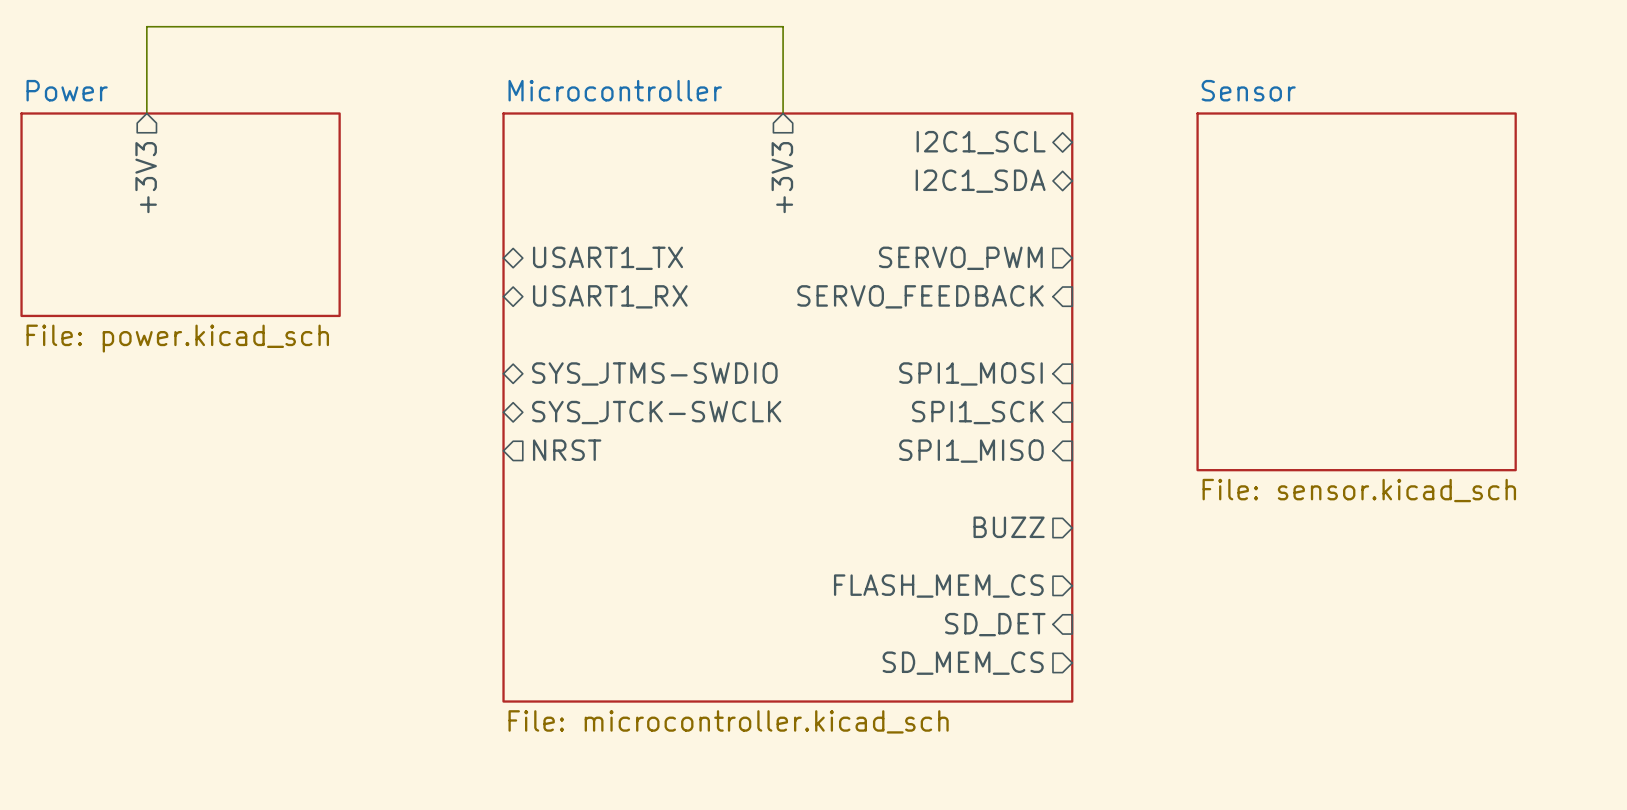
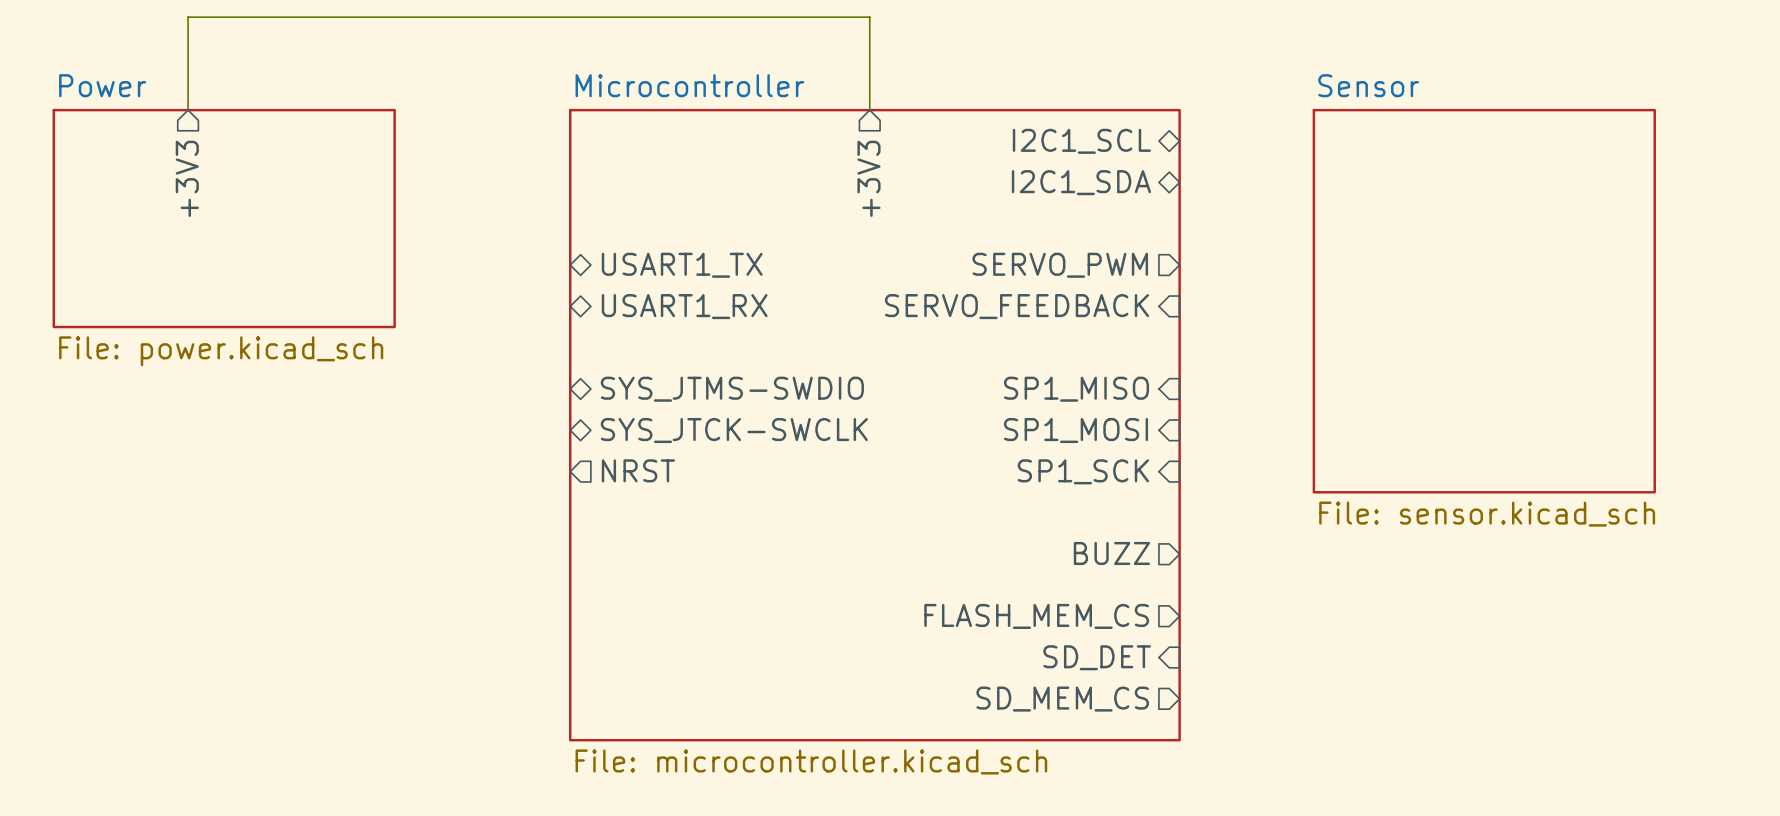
sheet pin: SPI1_MOSI (970, 373) -> SP1_MISO (1076, 389)
sheet pin: SPI1_SCK (977, 412) -> SP1_MOSI (1076, 430)
sheet pin: SPI1_MISO (971, 451) -> SP1_SCK (1083, 471)

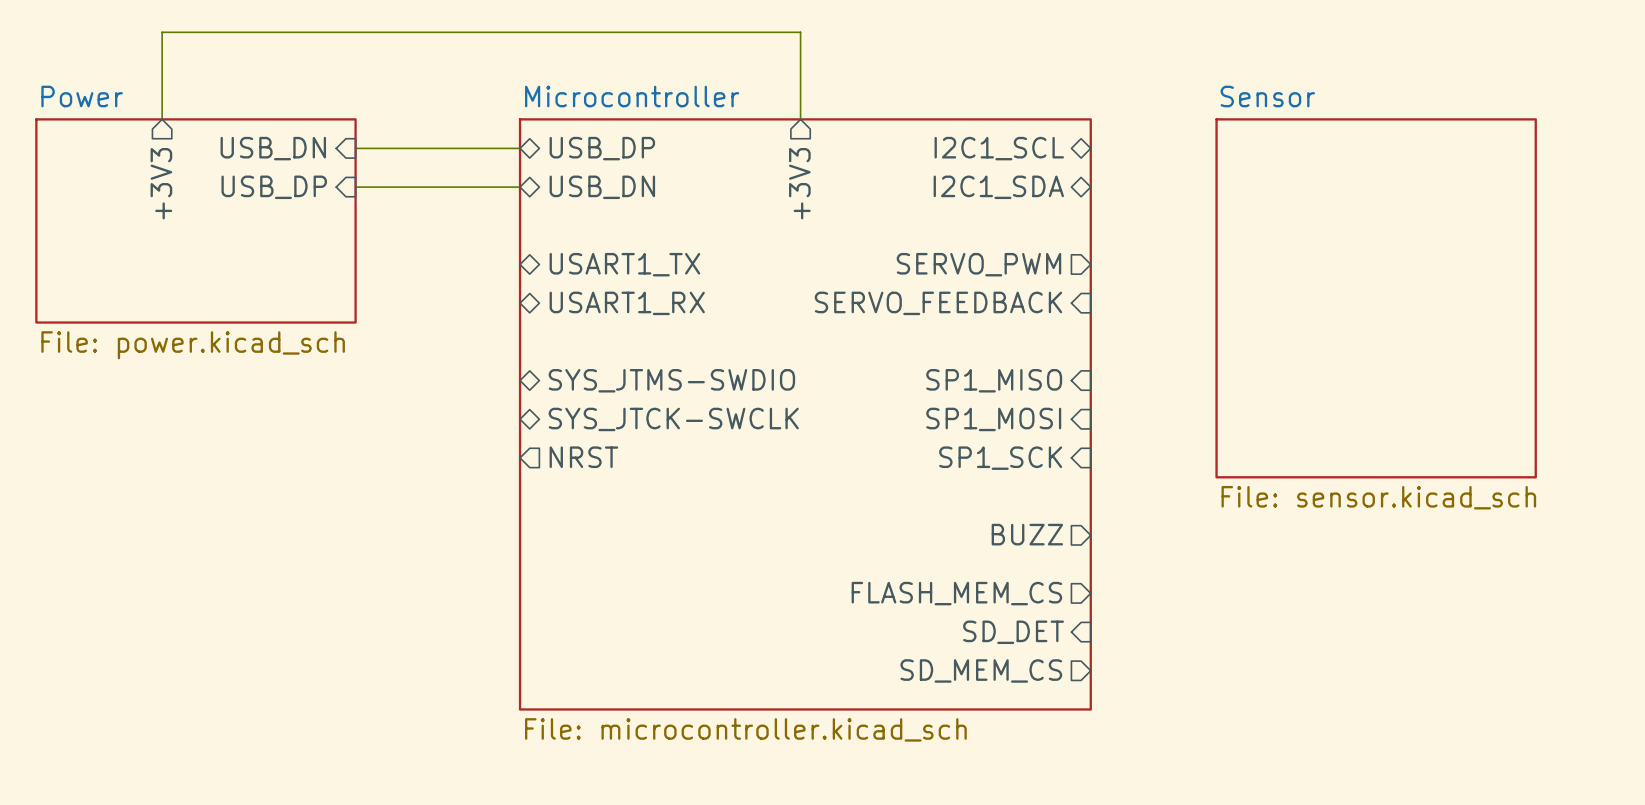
sheet pin: none -> USB_DN (273, 148)
wire: none -> (355, 148) (520, 148)
sheet pin: none -> USB_DP (602, 148)
sheet pin: none -> USB_DP (274, 187)
wire: none -> (355, 187) (520, 187)
sheet pin: none -> USB_DN (602, 187)

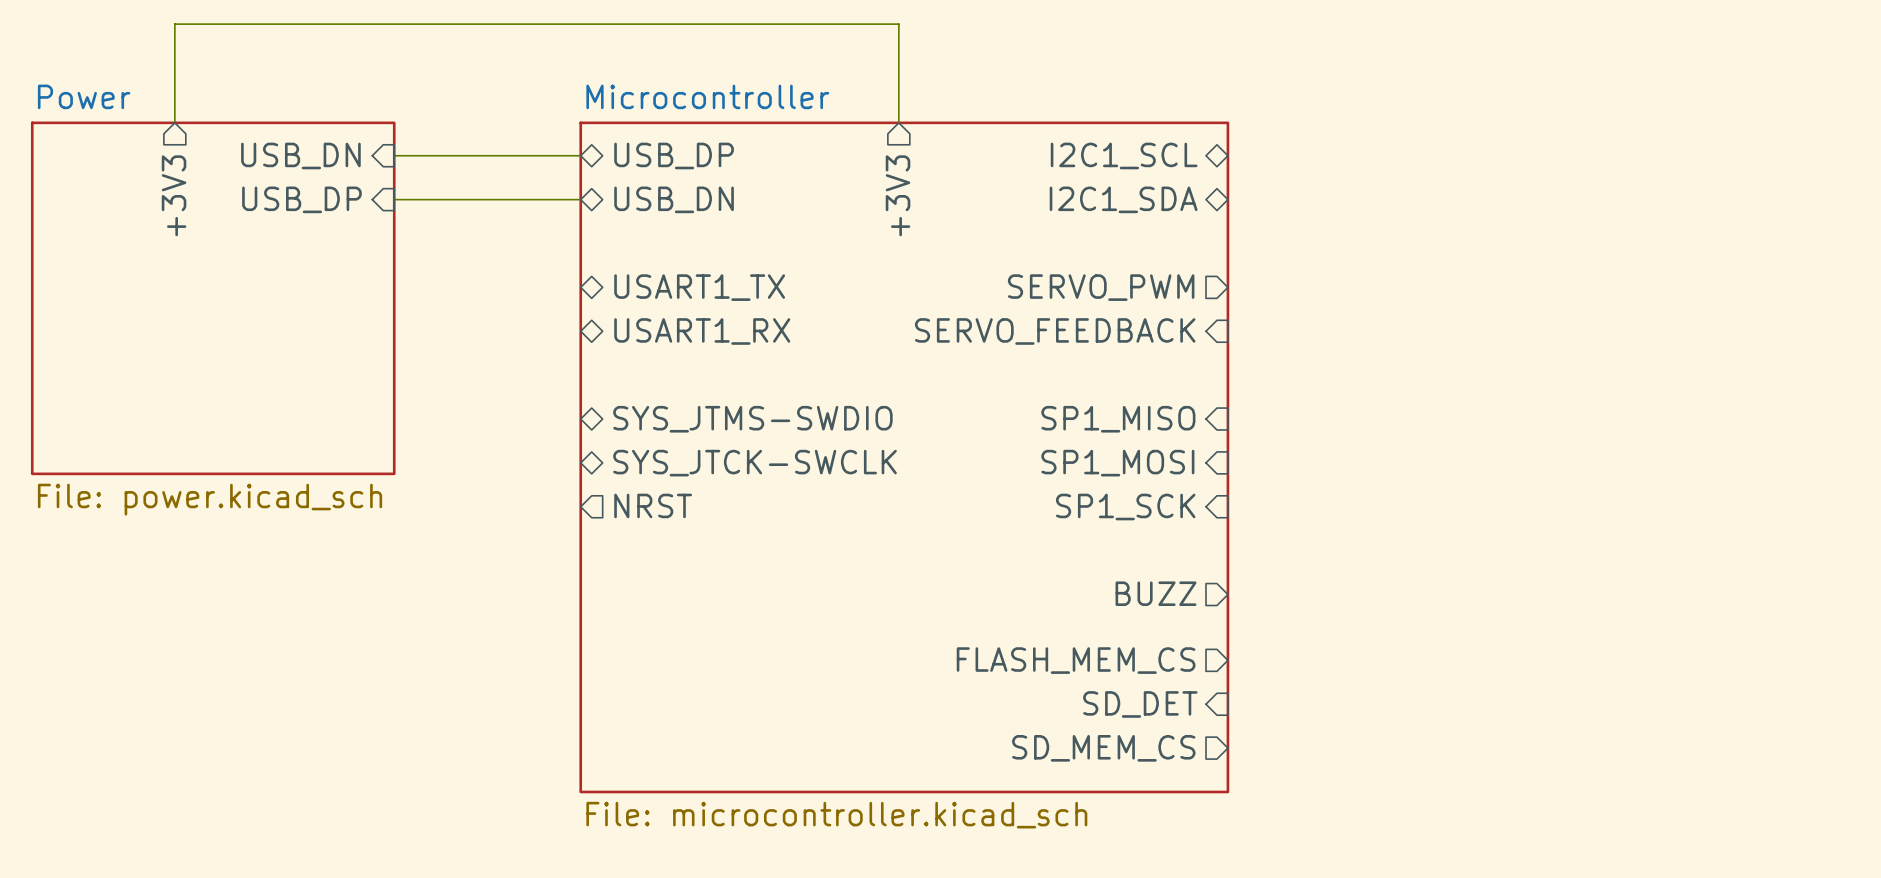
sheet Power: File: power.kicad_sch (195, 220) -> none
sheet Power: none -> File: power.kicad_sch (213, 298)
sheet Sensor: File: sensor.kicad_sch (1376, 298) -> none

